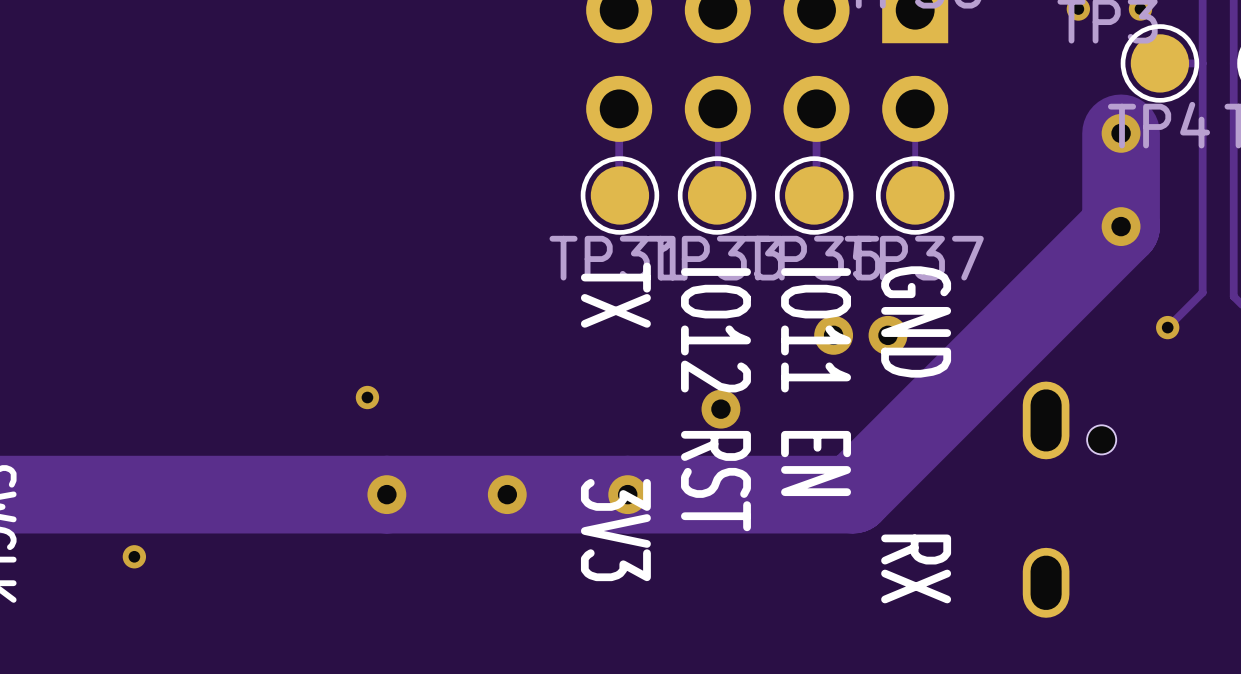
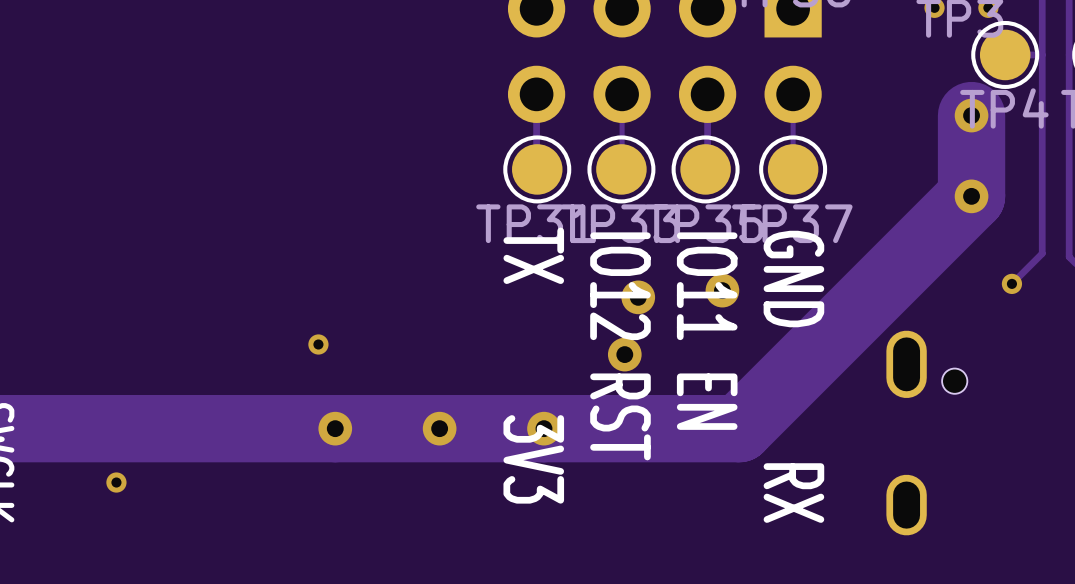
via position: (887, 335) -> (638, 297)

